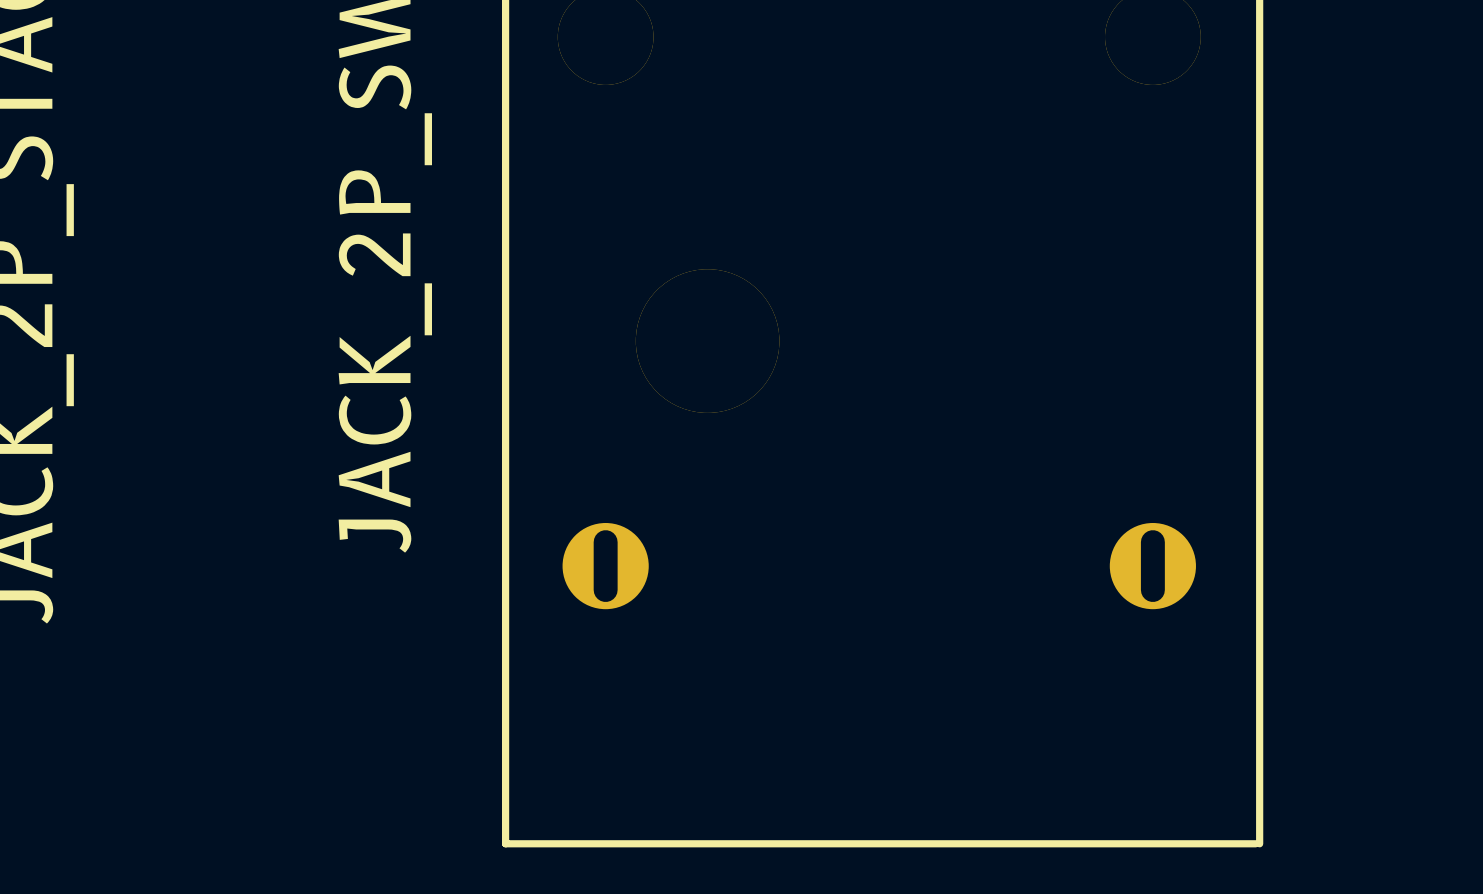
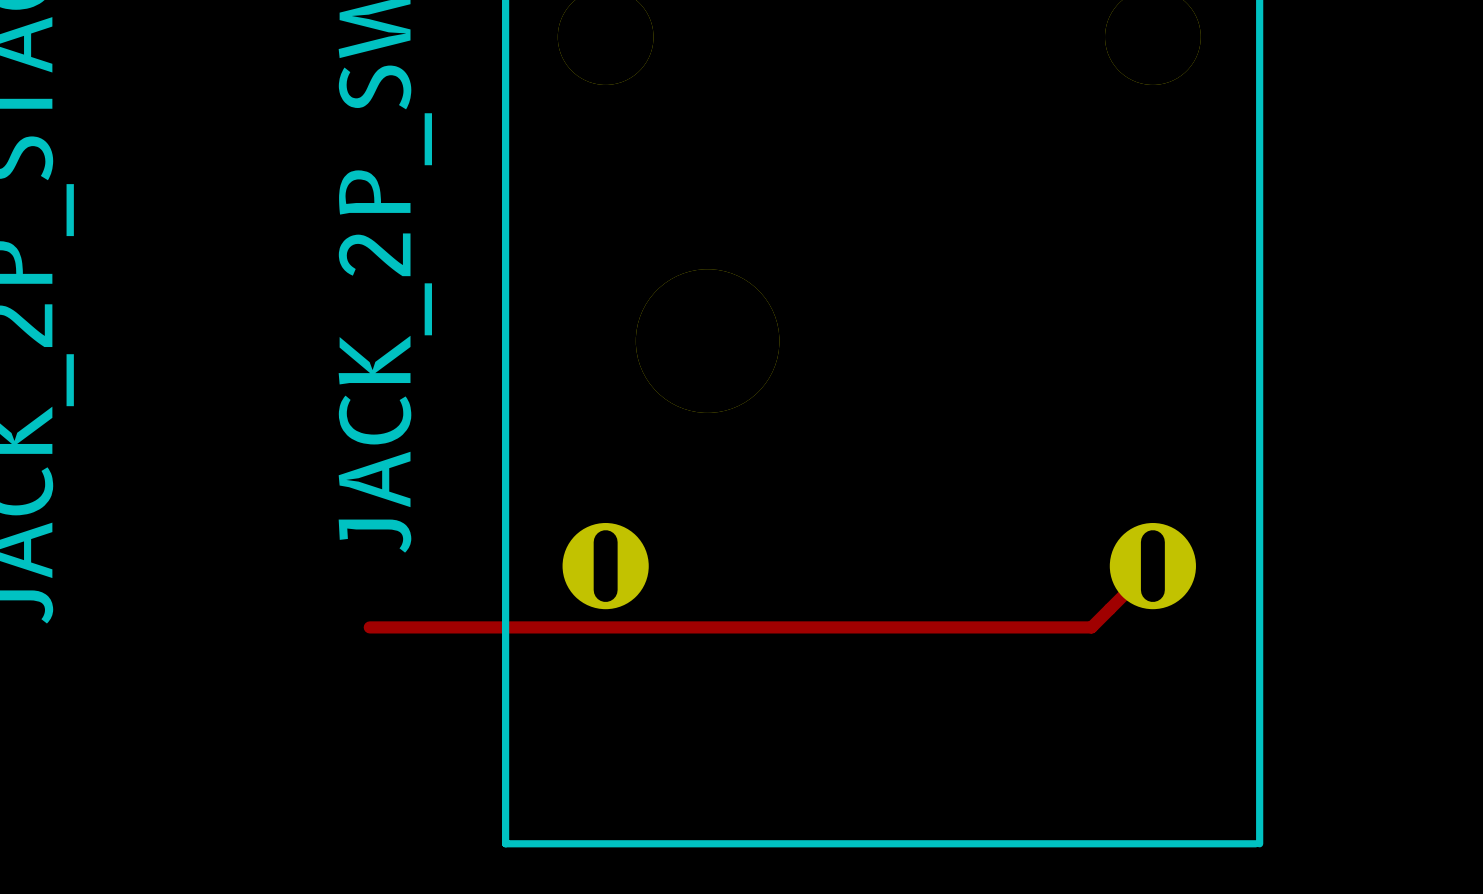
track: none -> (1152, 566) (1091, 627) (369, 627)

